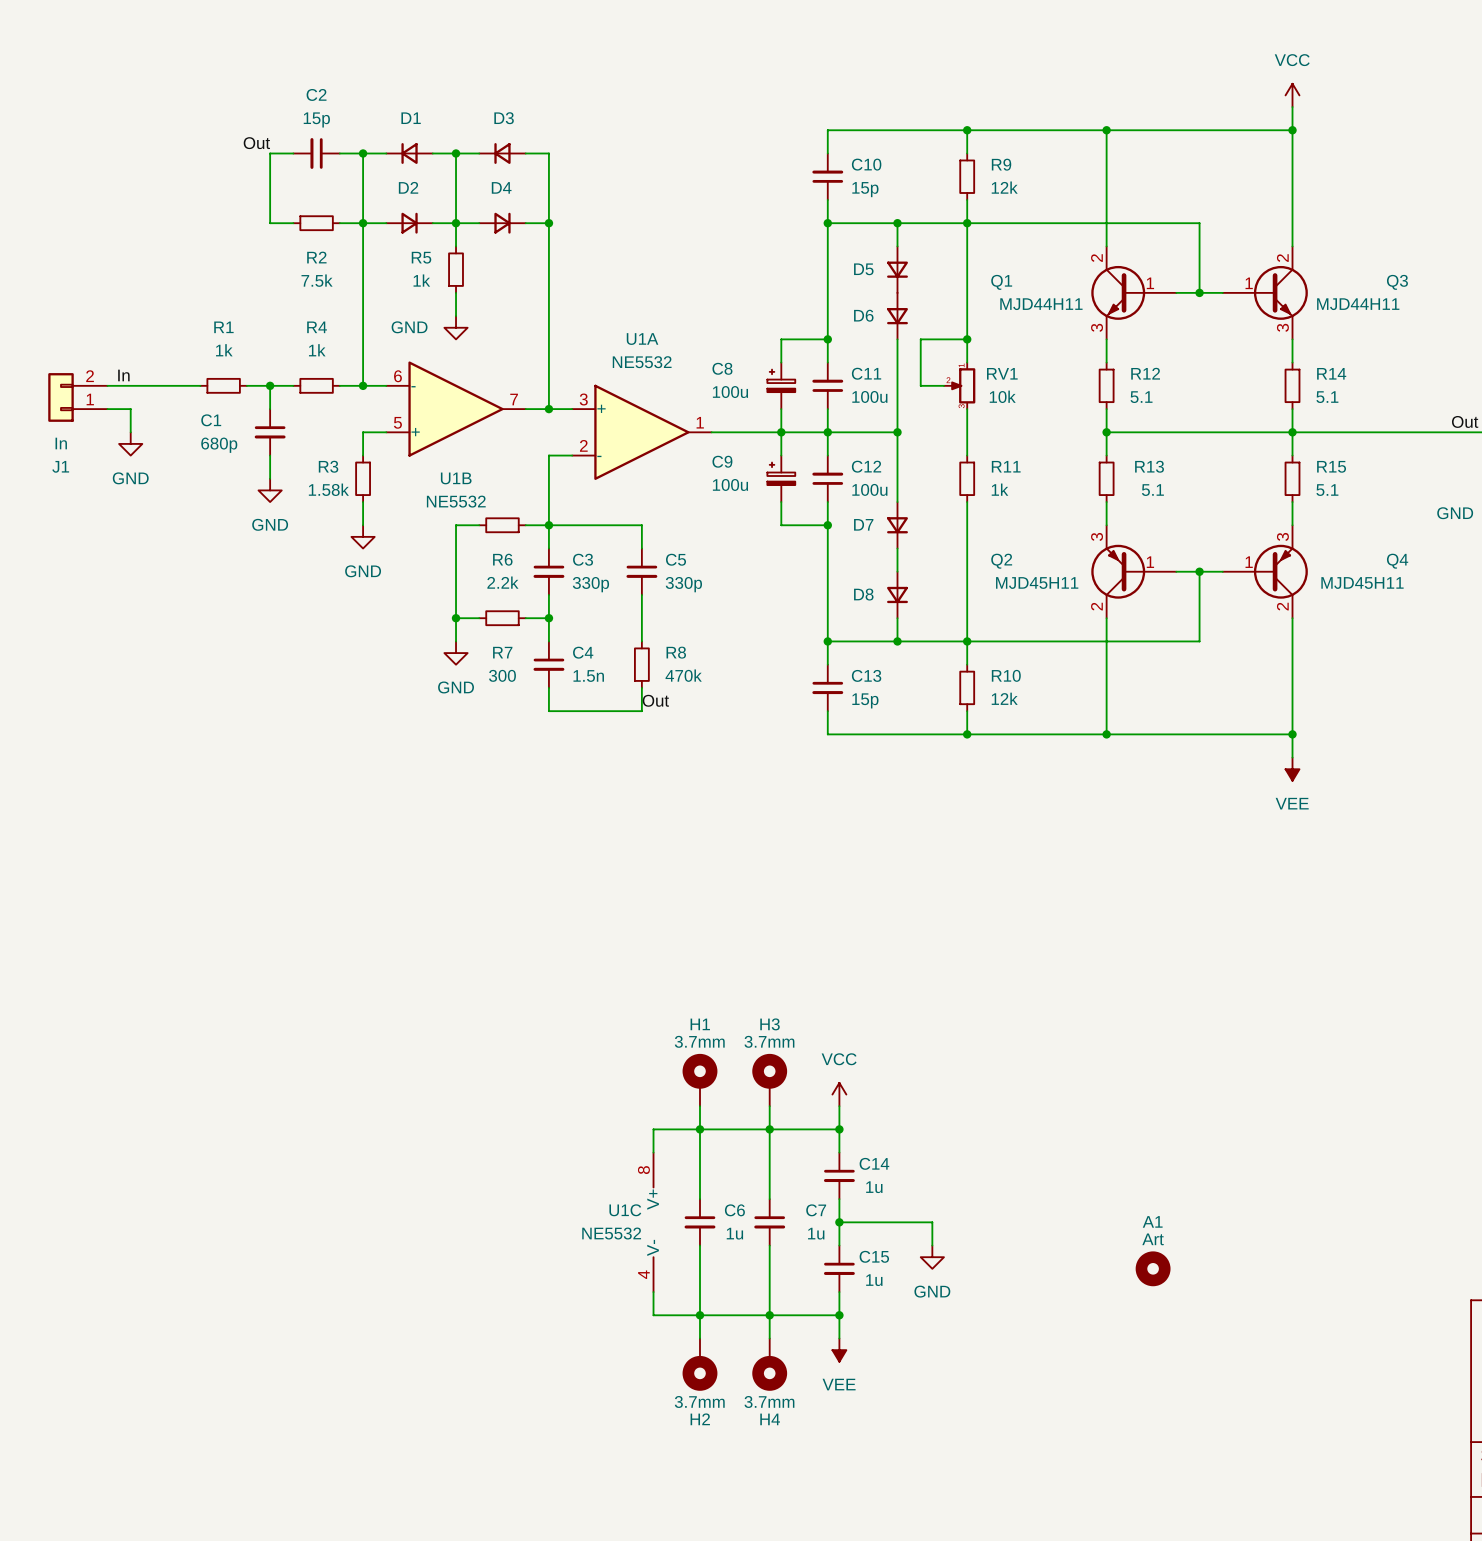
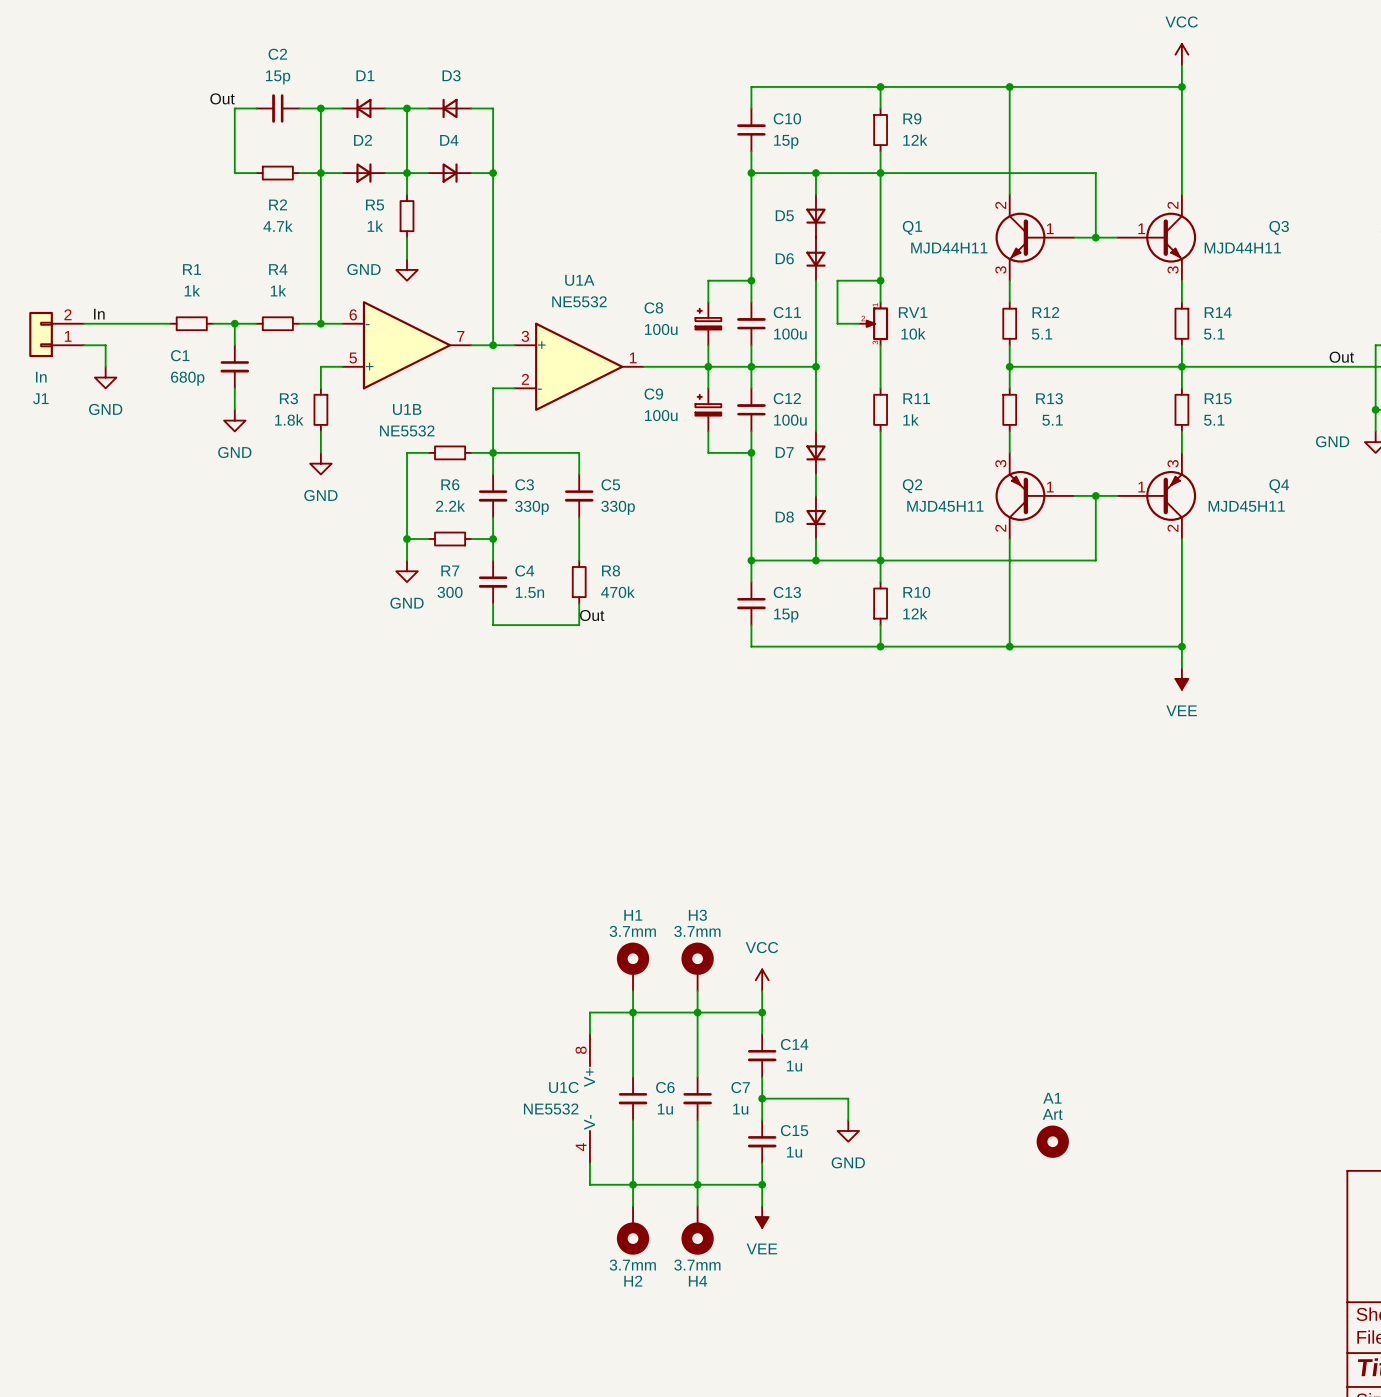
R2 value: 7.5k (317, 280) -> 4.7k (278, 226)
R3 value: 1.58k (328, 489) -> 1.8k (289, 420)

